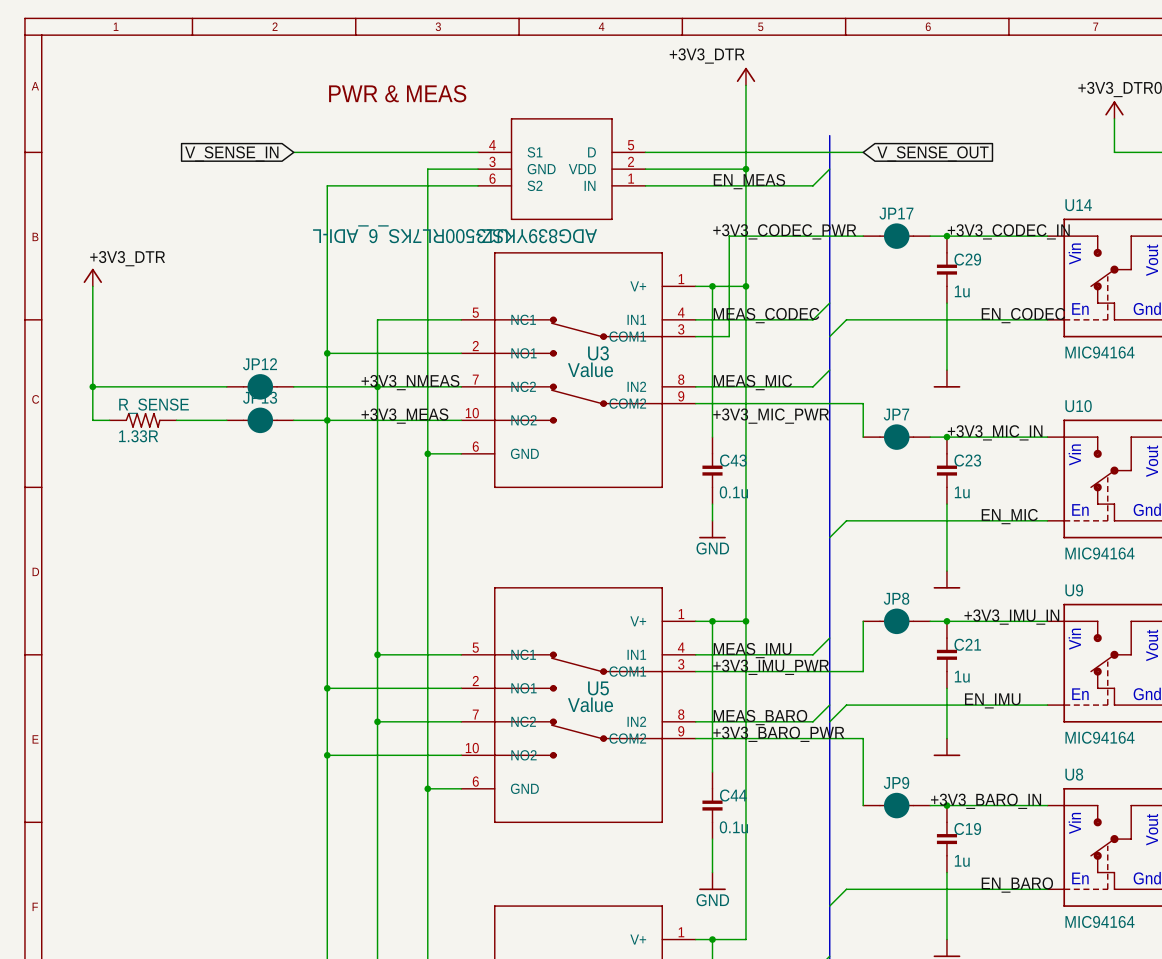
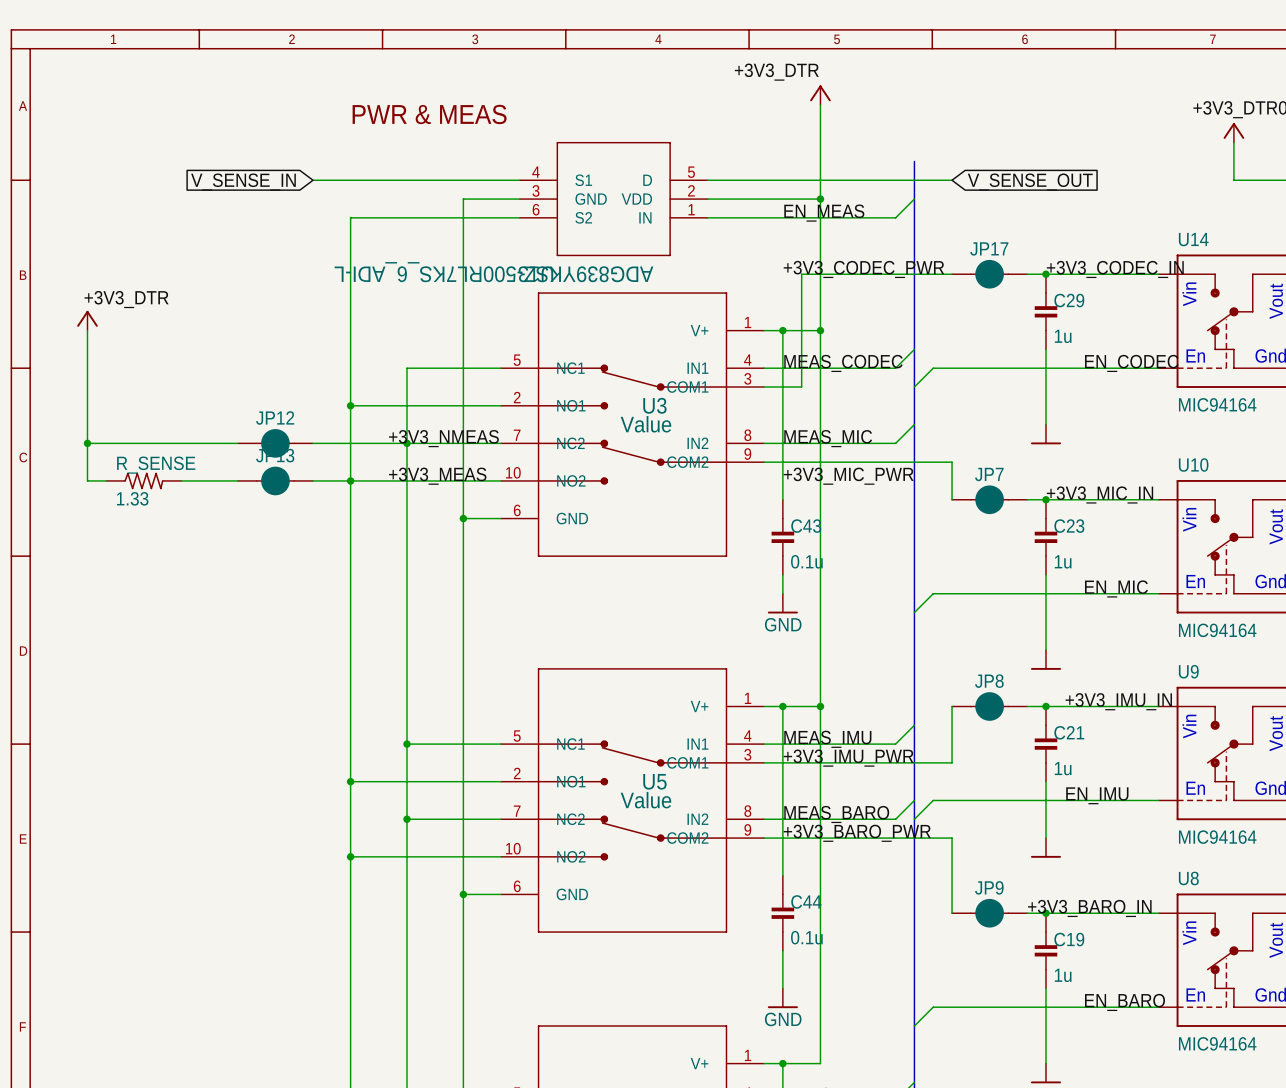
R_SENSE value: 1.33R (138, 436) -> 1.33 (132, 498)

